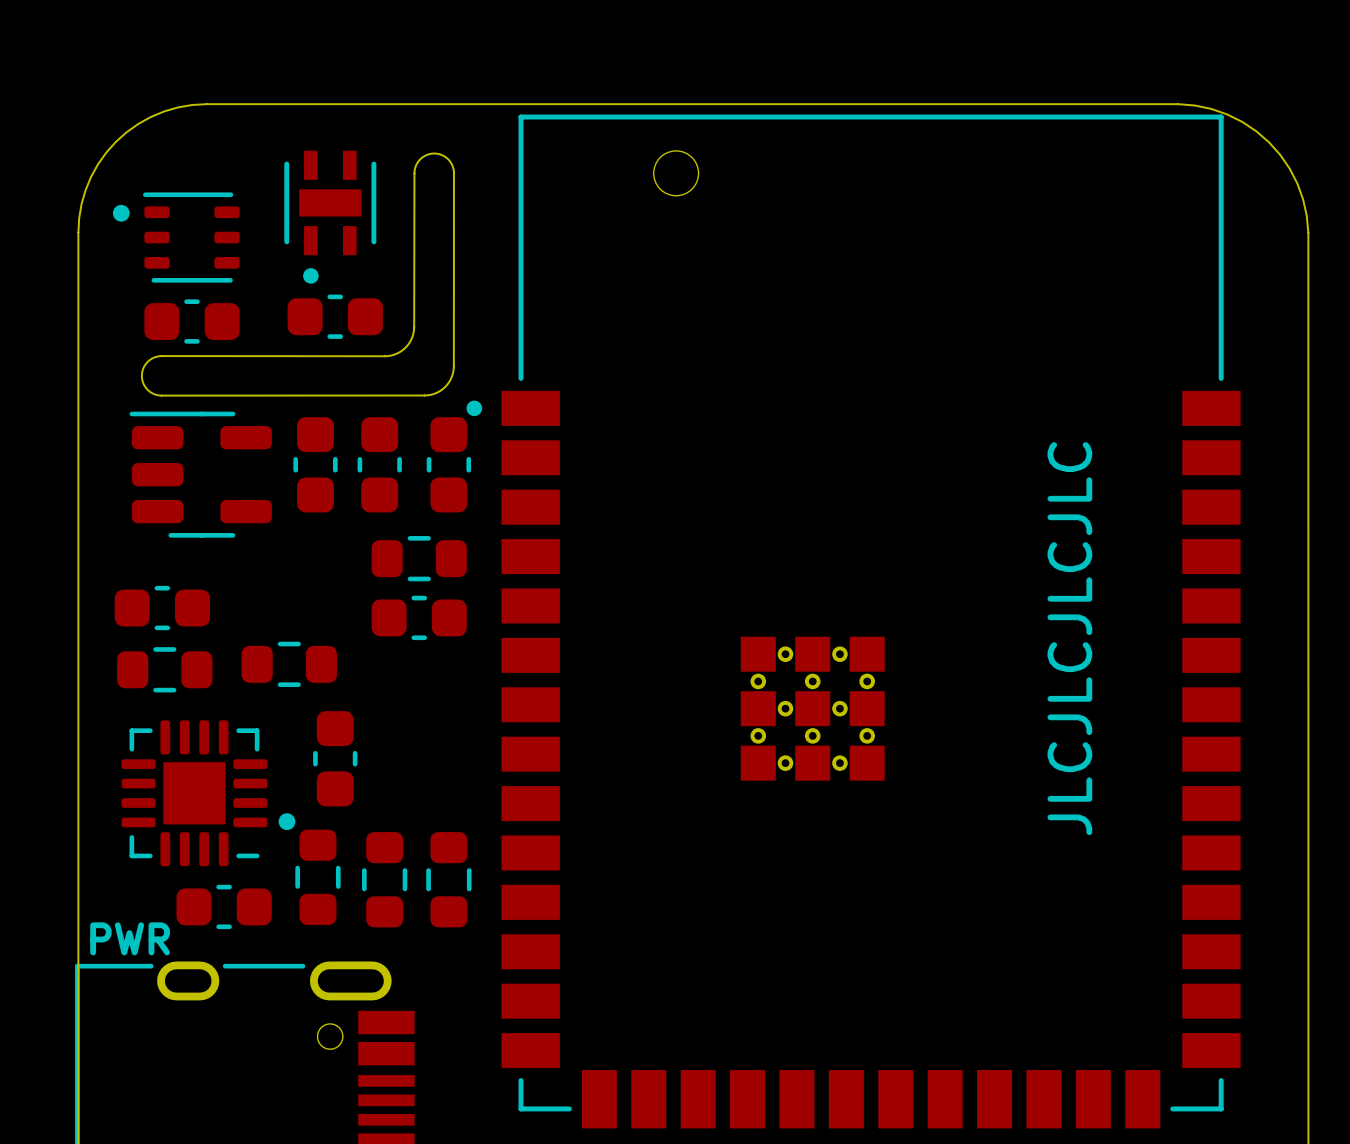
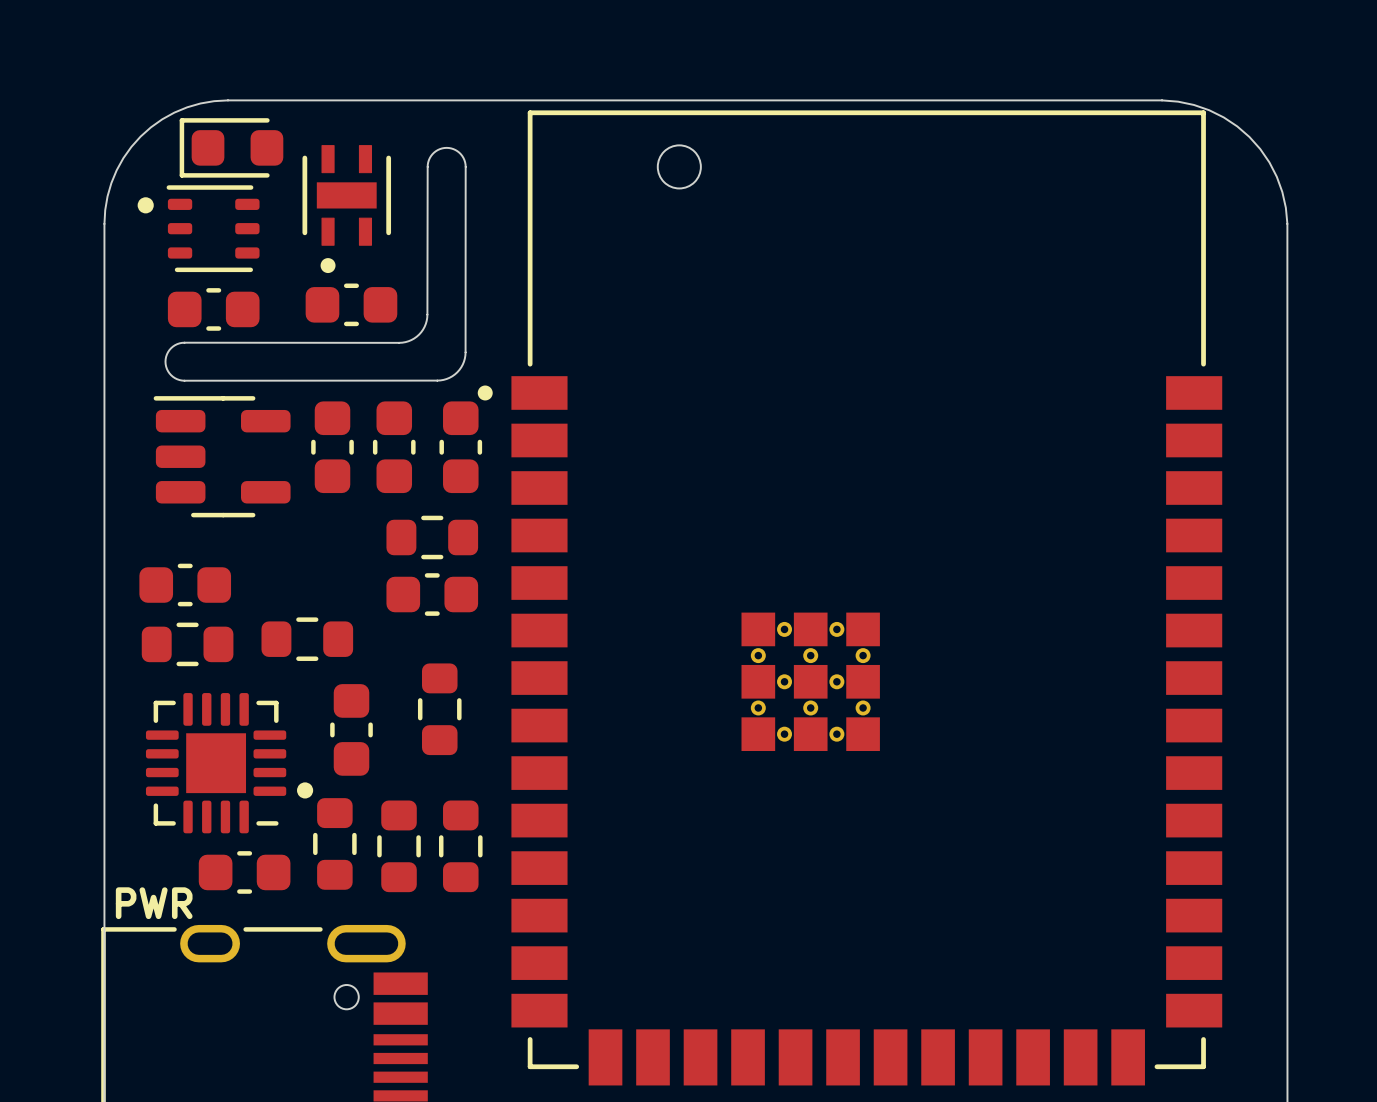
part: none -> (231, 147)
text: JLCJLCJLCJLC (1069, 638) -> none
part: none -> (439, 709)

